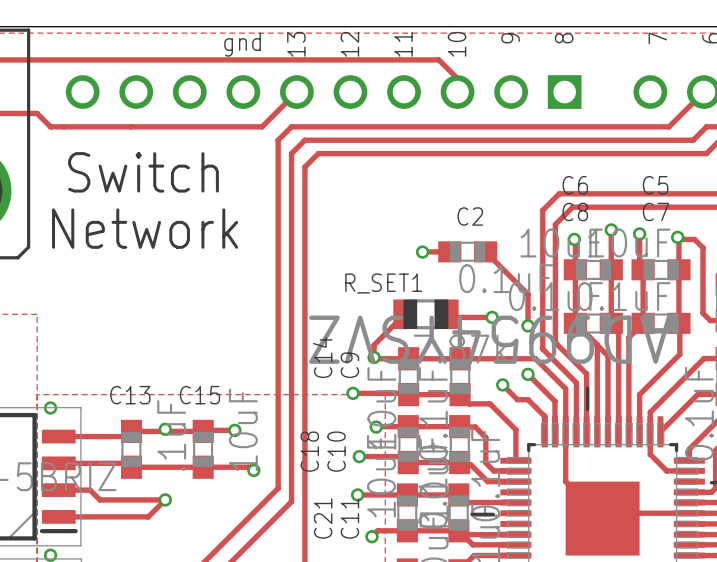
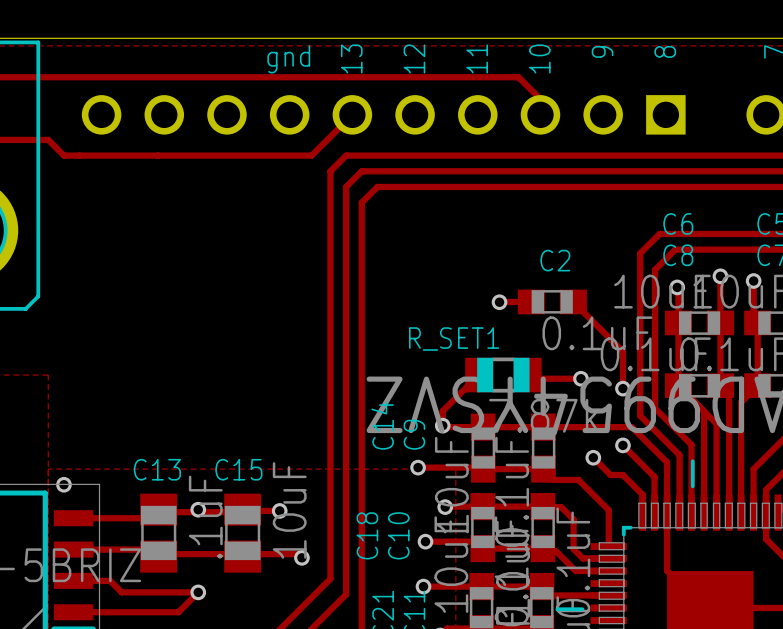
text: Switch (143, 172) -> none
text: Network (145, 228) -> none
C13 footprint: [120, 419, 143, 479] -> [140, 493, 178, 573]
C15 footprint: [192, 419, 214, 479] -> [224, 493, 262, 573]

